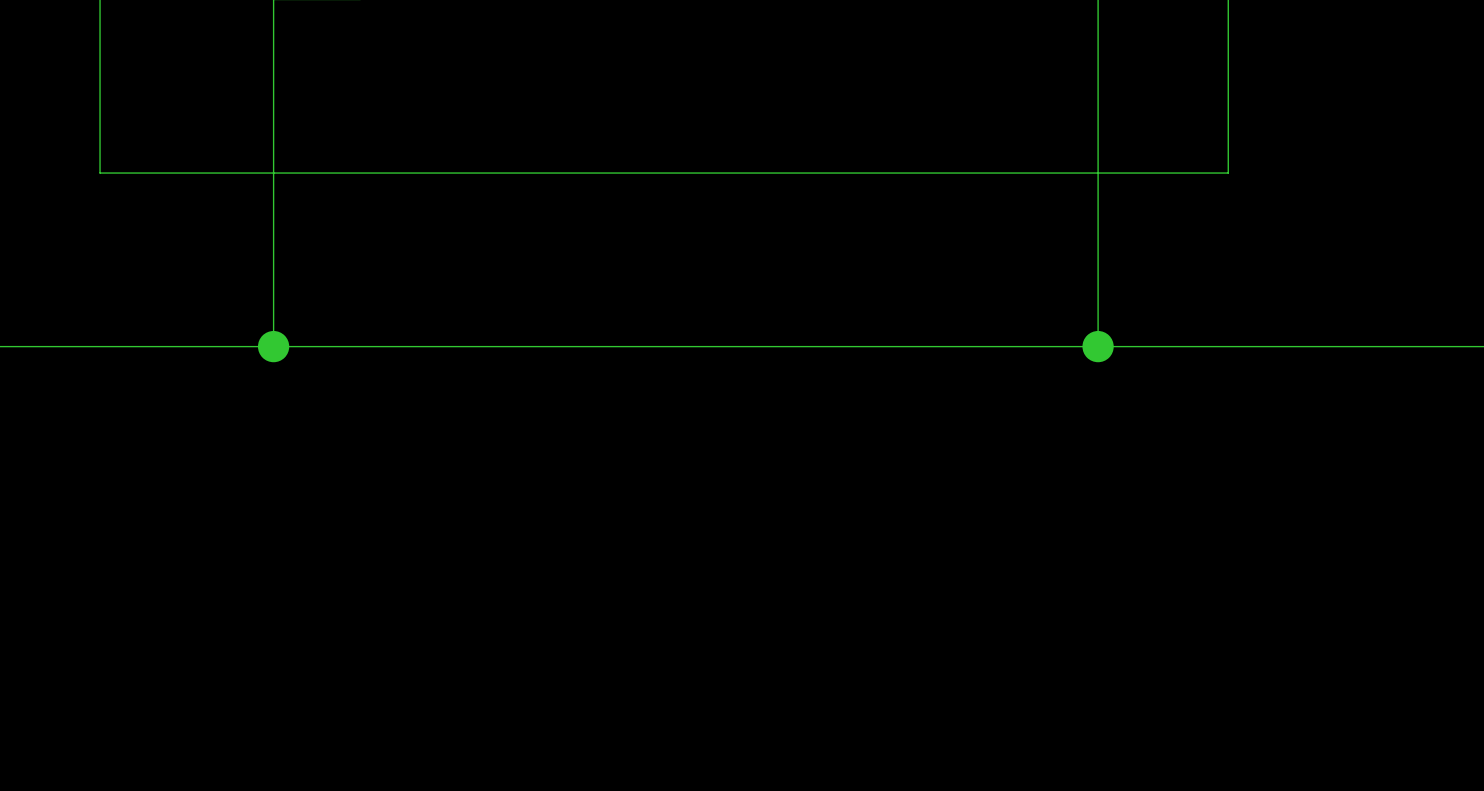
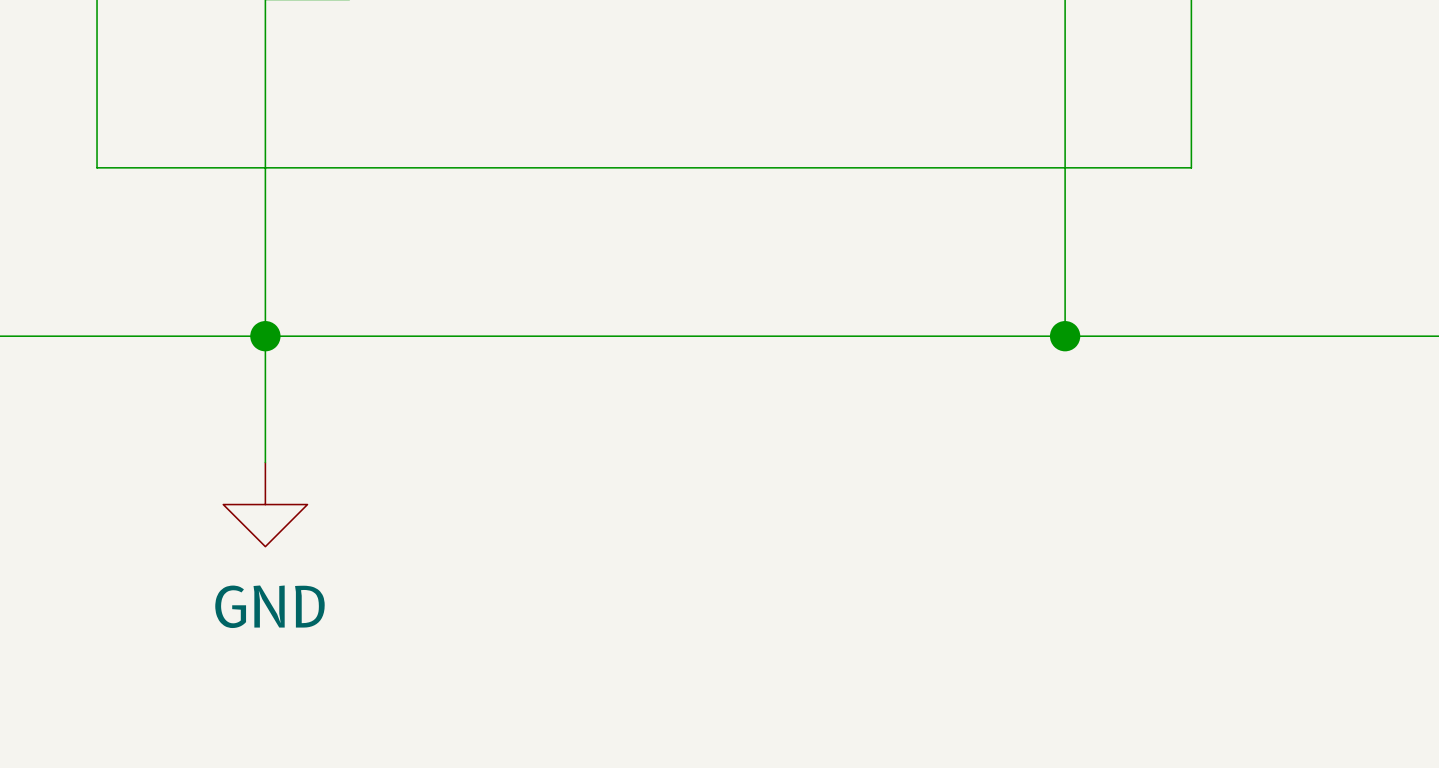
wire: none -> (265, 336) (265, 462)
power symbol: none -> GND (265, 504)

